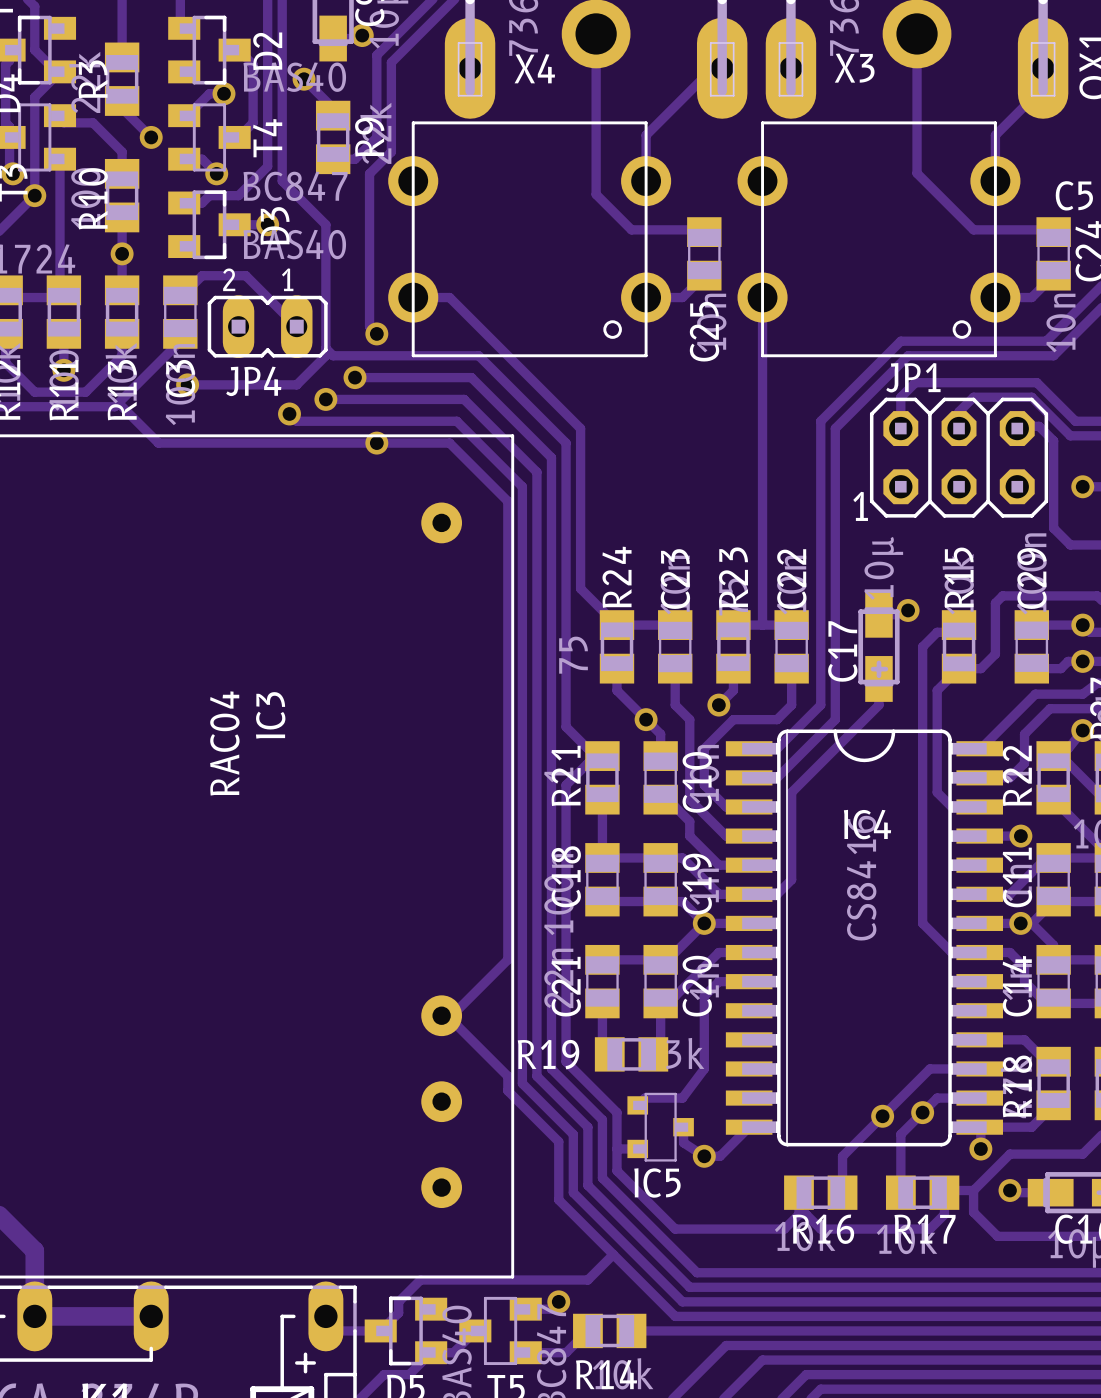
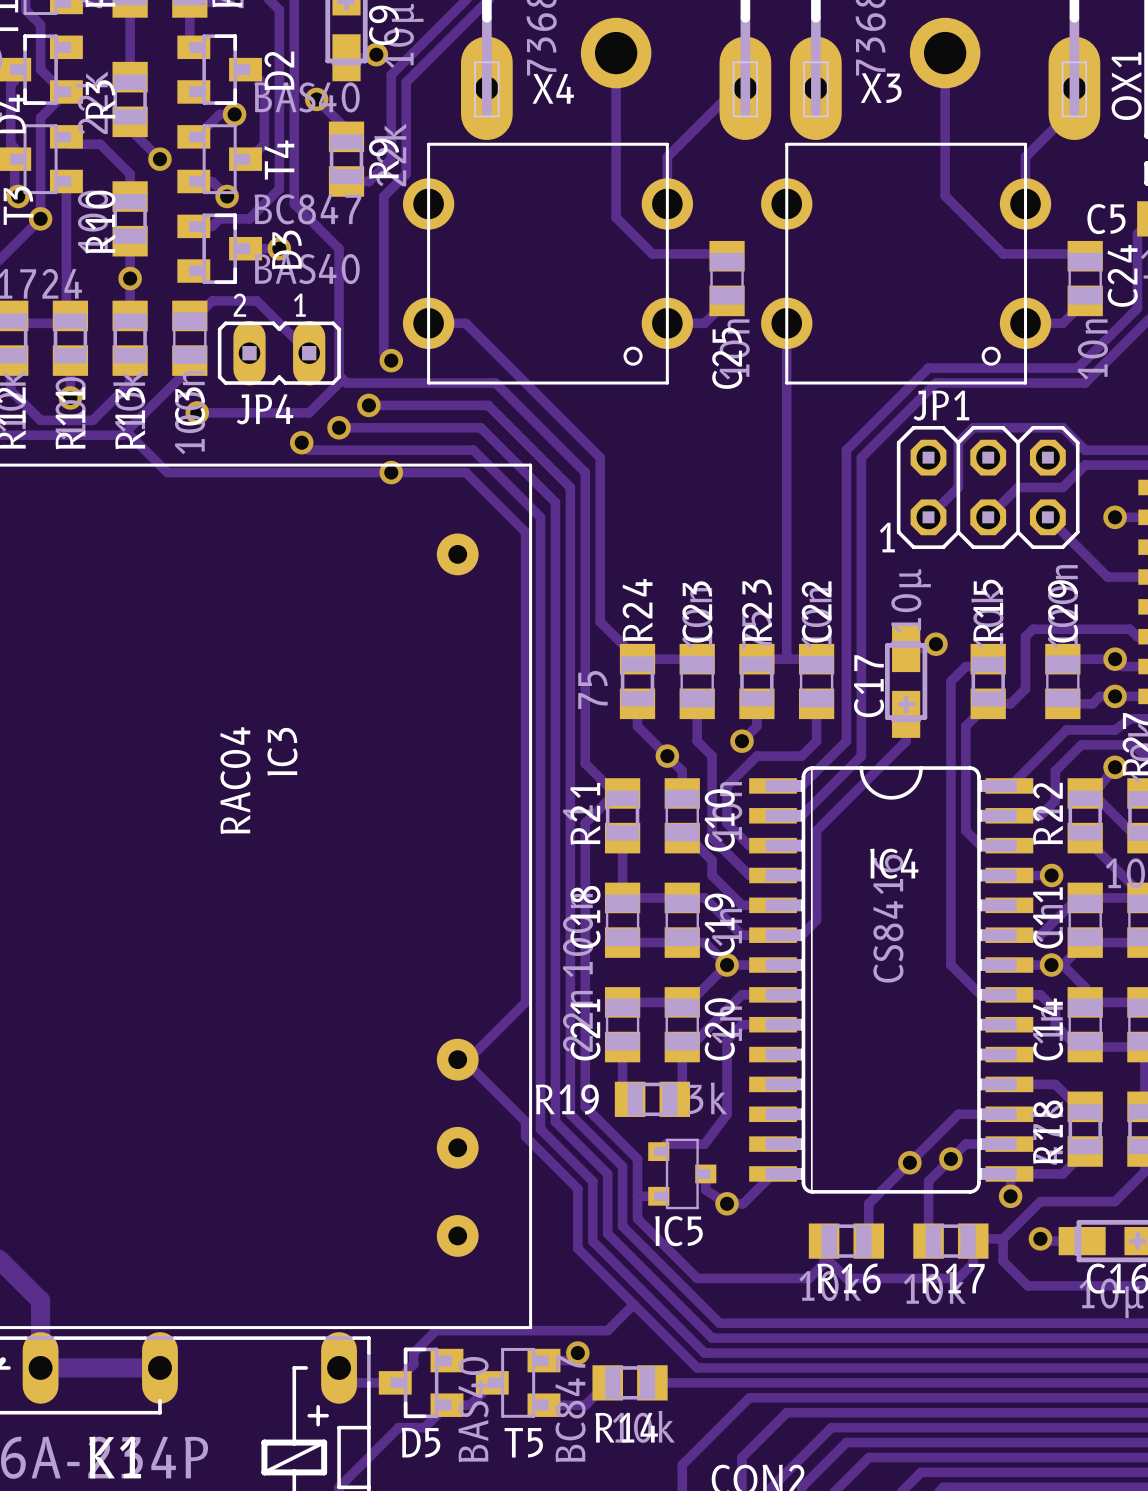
track: (1075, 421) (1036, 382) (915, 382) (900, 397) (900, 428) -> (1107, 450) (1085, 450) (1062, 427) (973, 427) (958, 442) (958, 487) (928, 517)
track: (959, 428) (959, 411) (973, 397) (1031, 397) (1070, 435) -> (988, 517) (1018, 487) (1062, 487) (1085, 465) (1102, 465)
track: (1017, 428) (1019, 426) (1039, 426) (1053, 440) (1053, 528) (1070, 544) (1075, 544) -> (1047, 517) (1107, 577)

